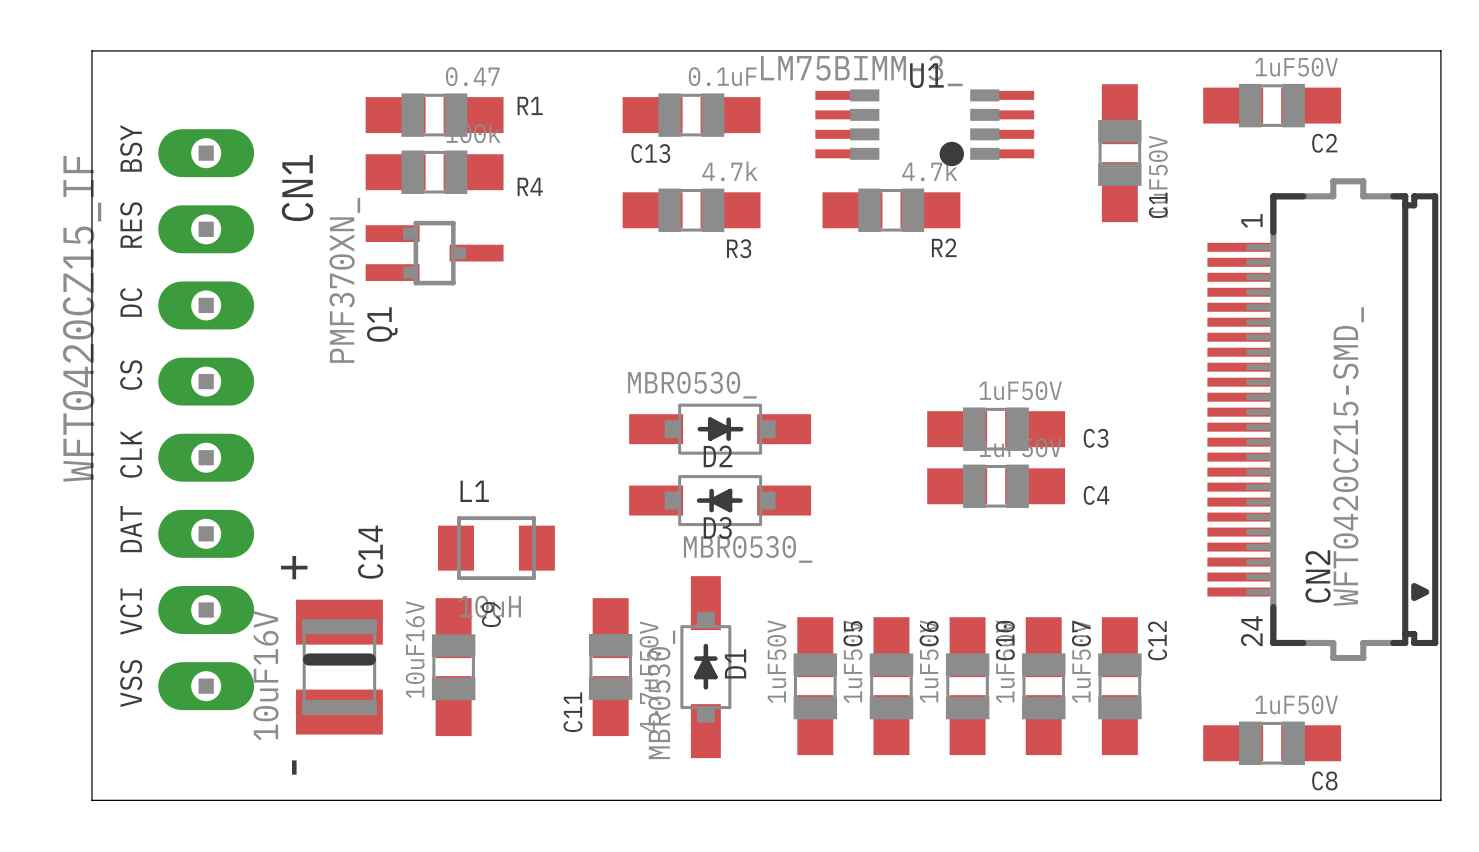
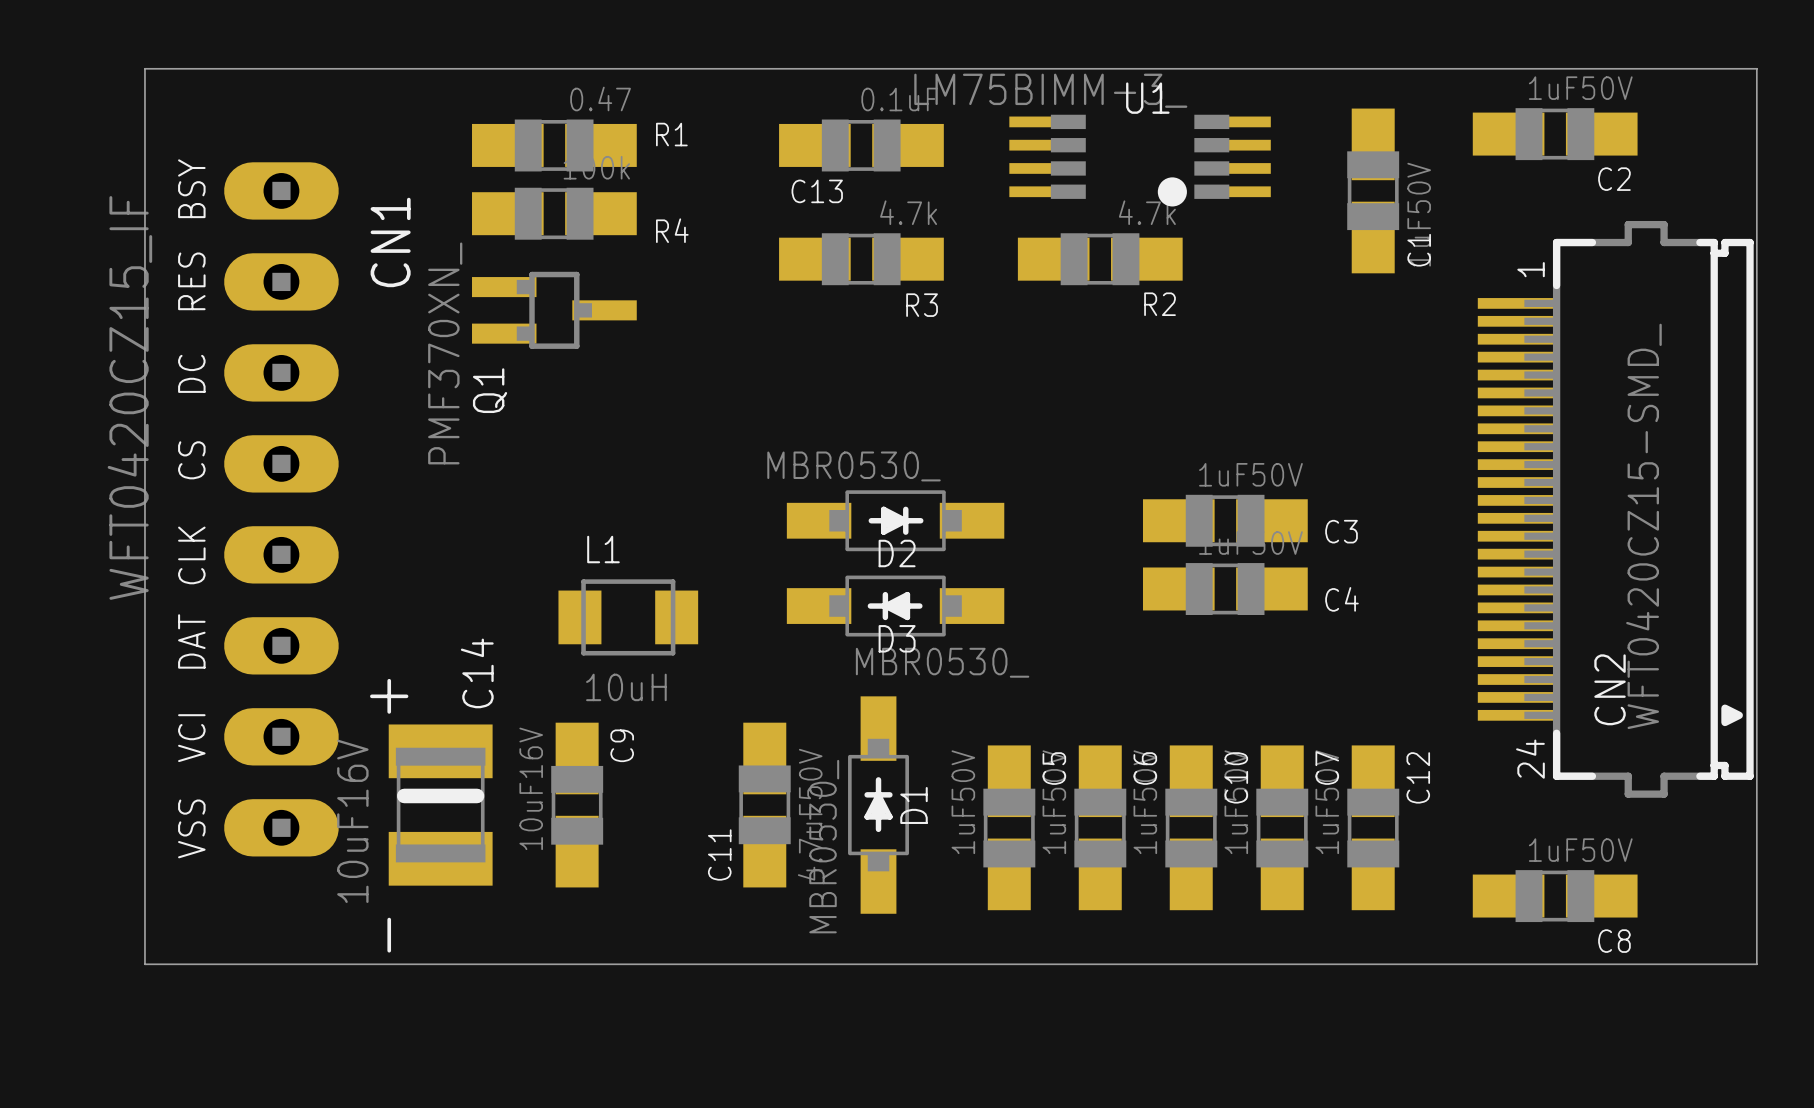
L1 position: (496, 548) -> (628, 617)

